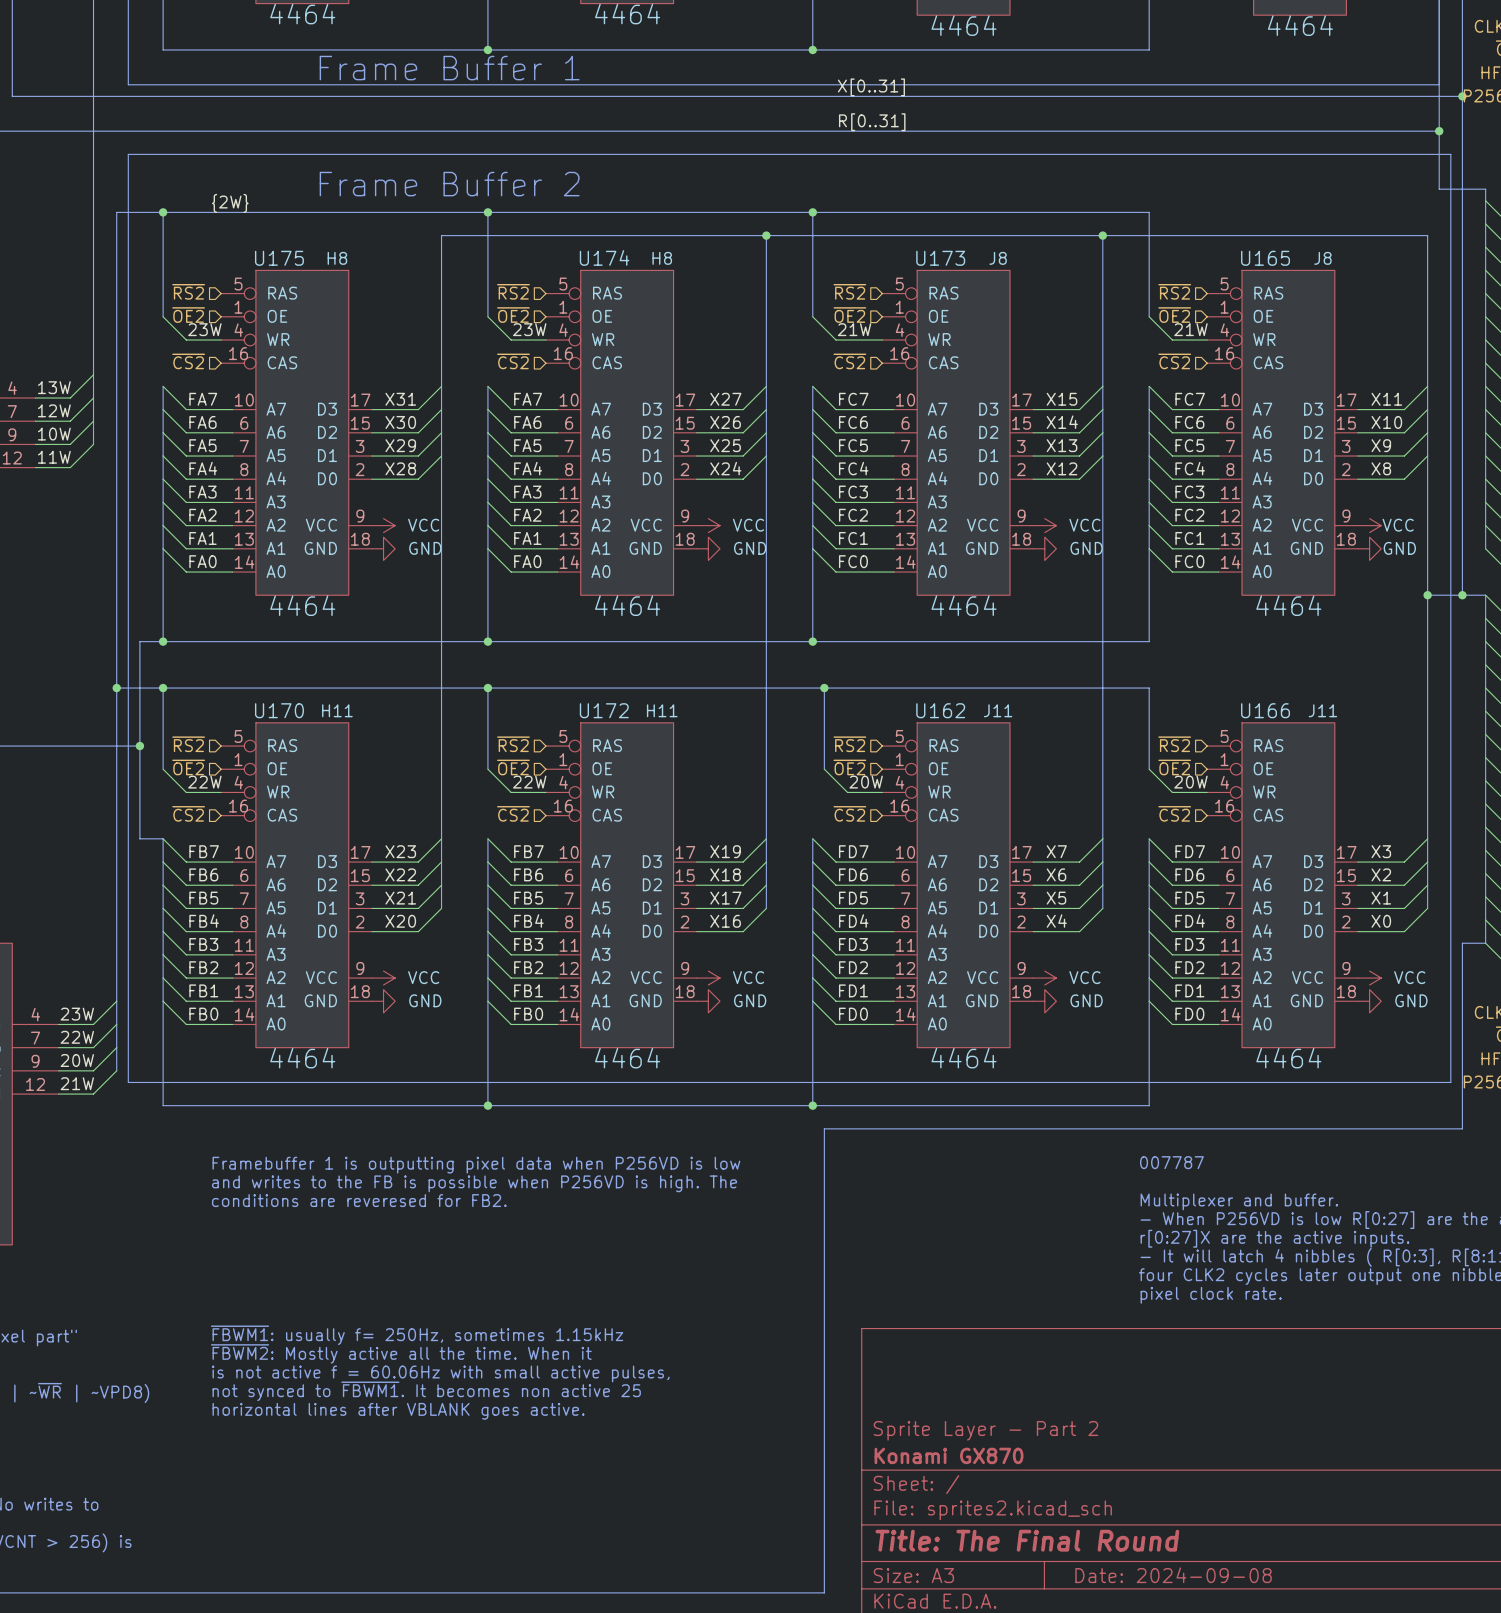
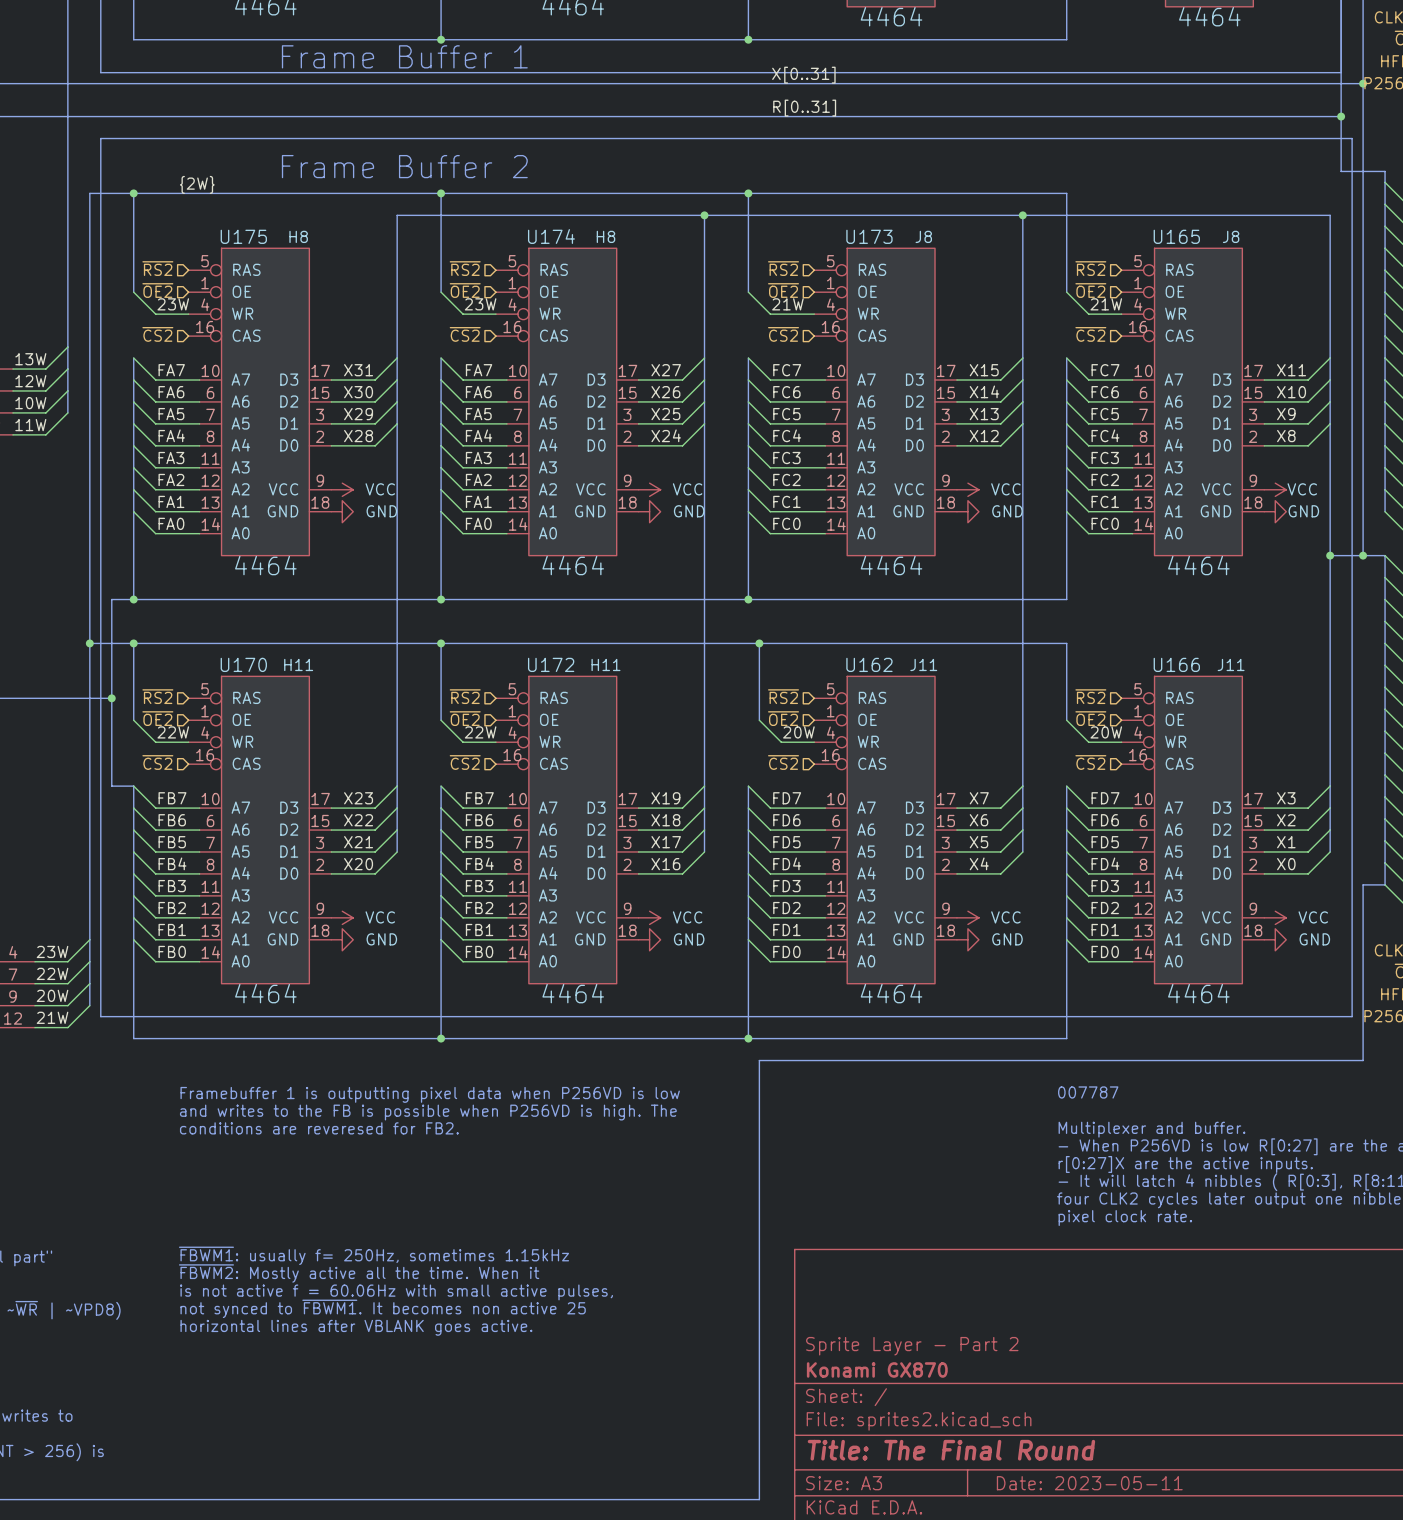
title block: Date: 2024-09-08 (1173, 1575) -> Date: 2023-05-11 (1089, 1483)

